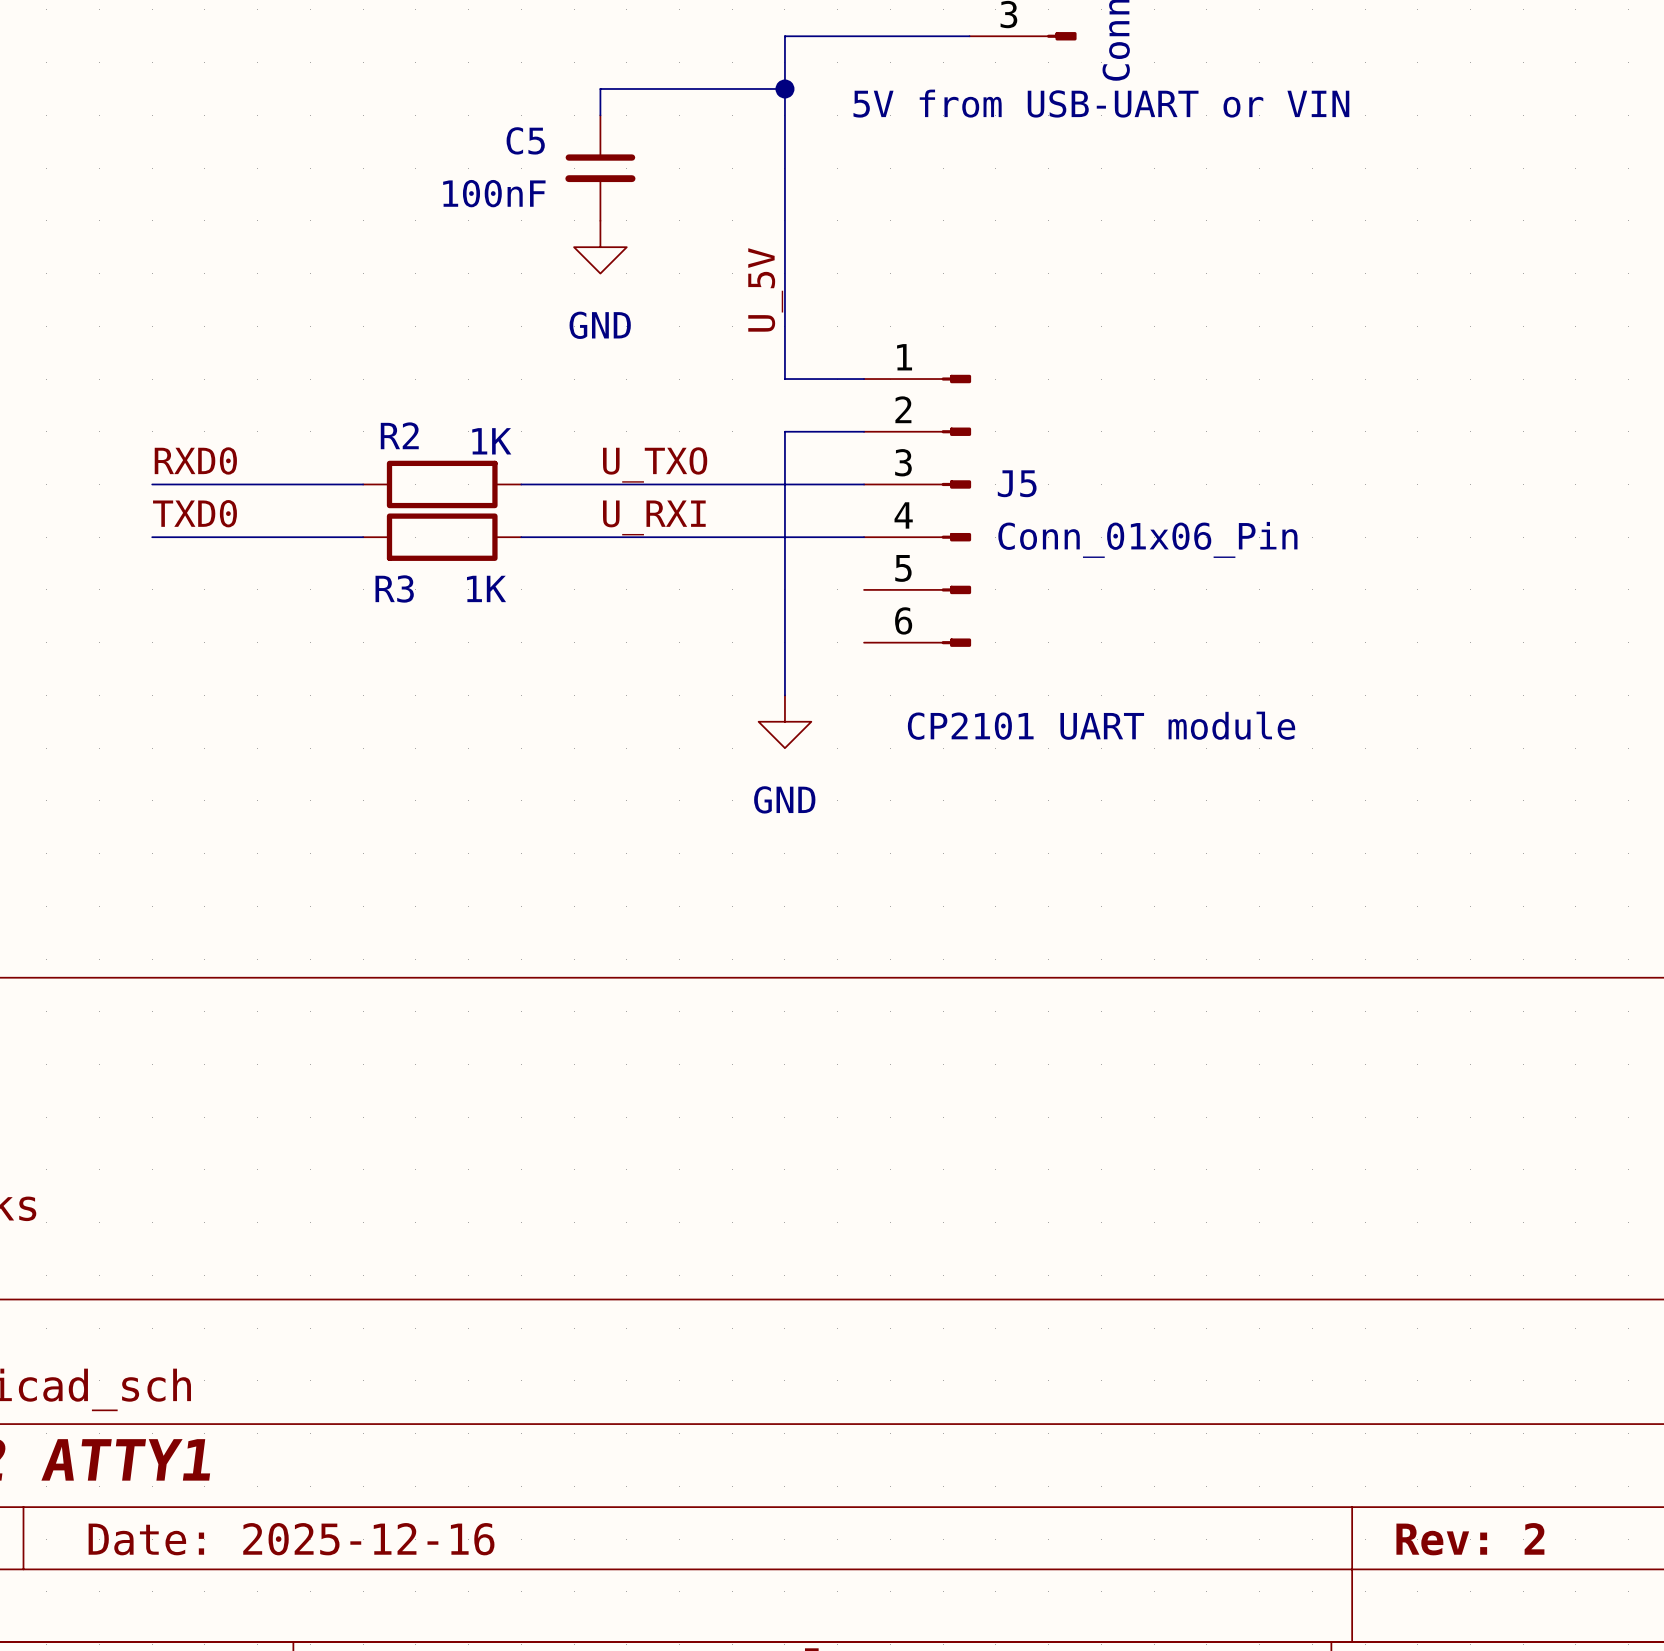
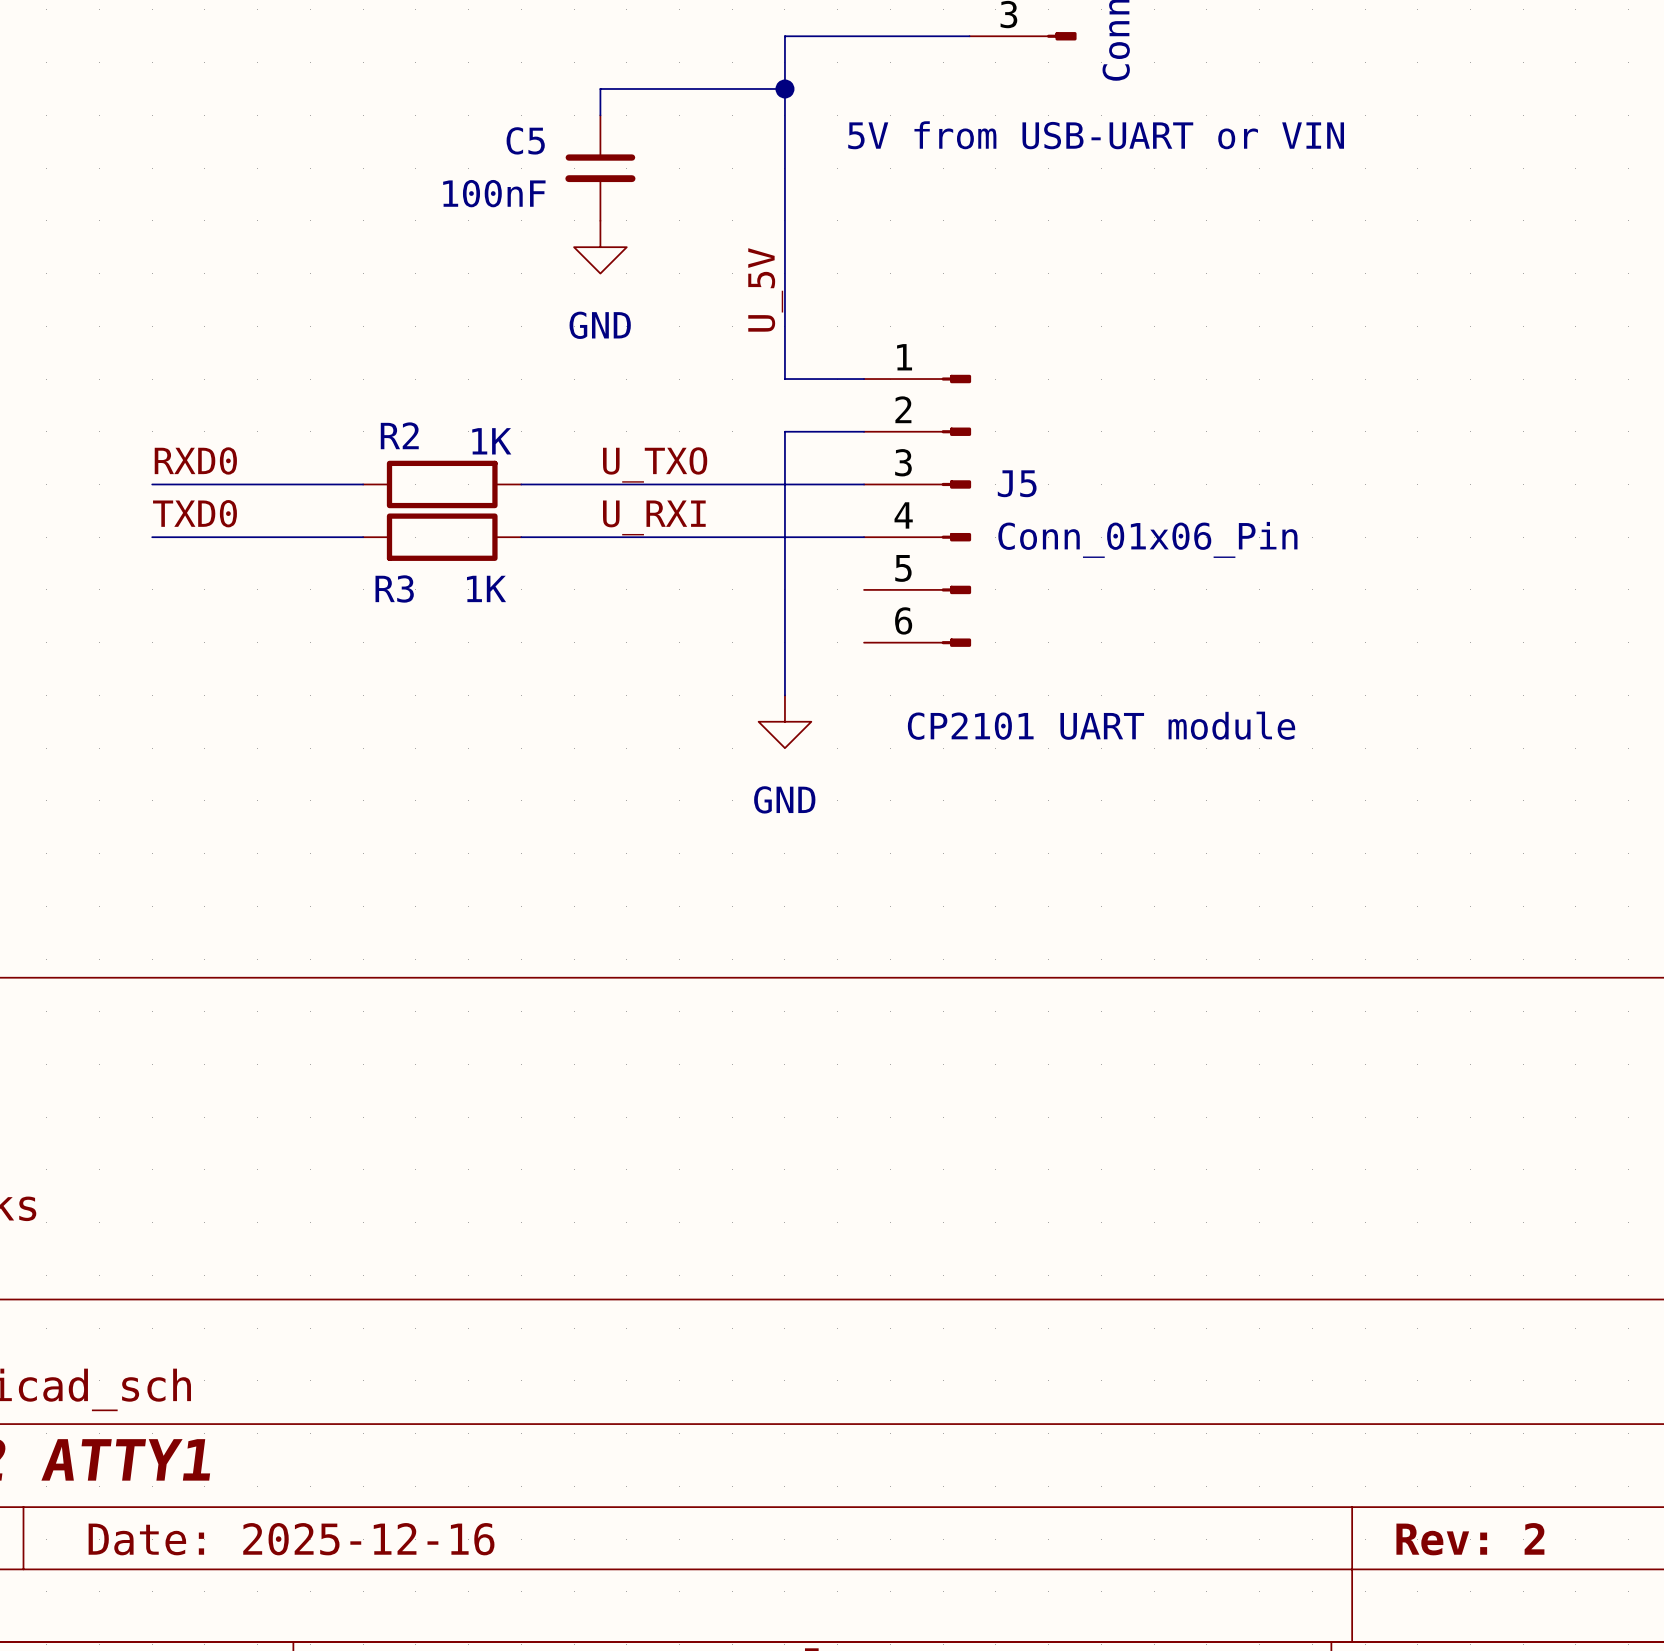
text position: 5V from USB-UART or VIN (1101, 103) -> 5V from USB-UART or VIN (1096, 135)

